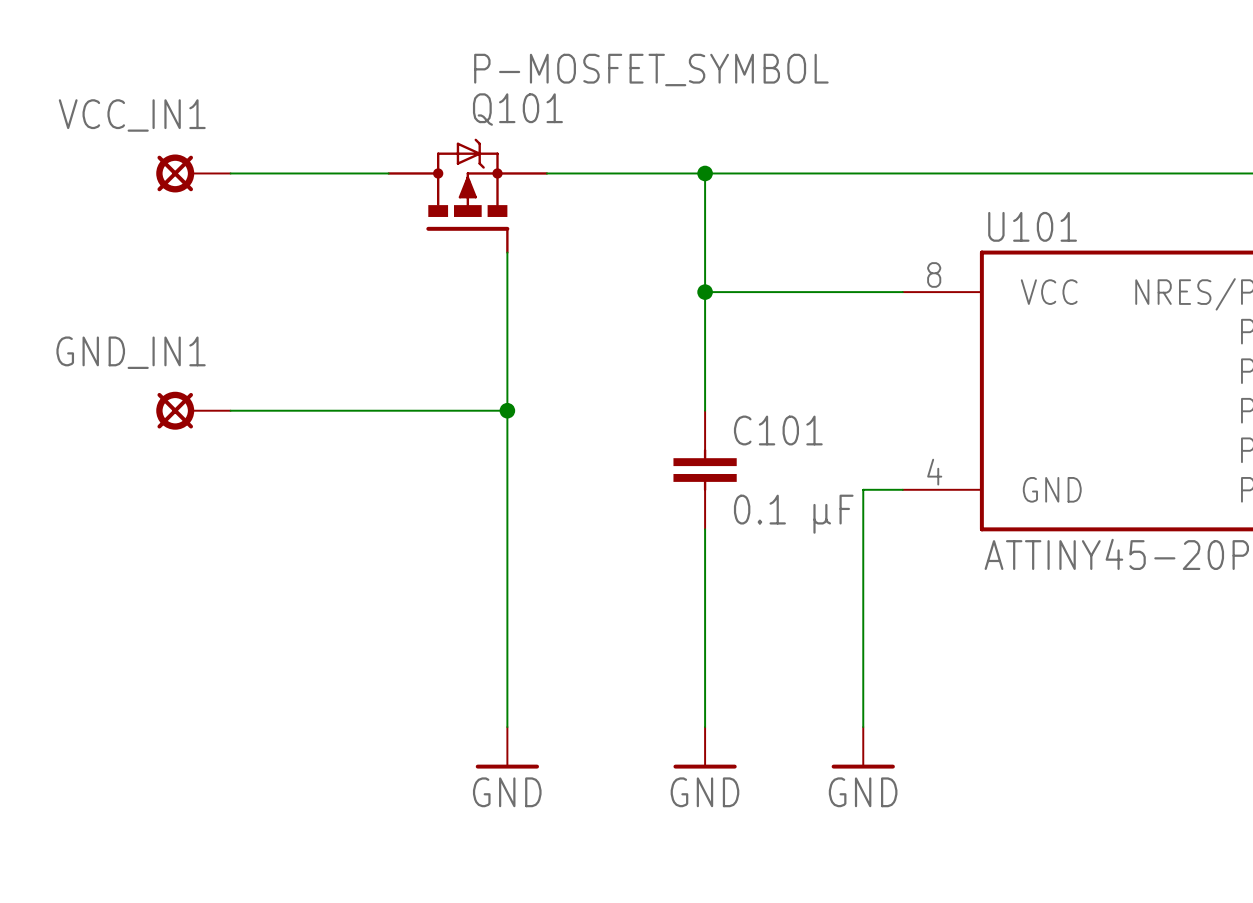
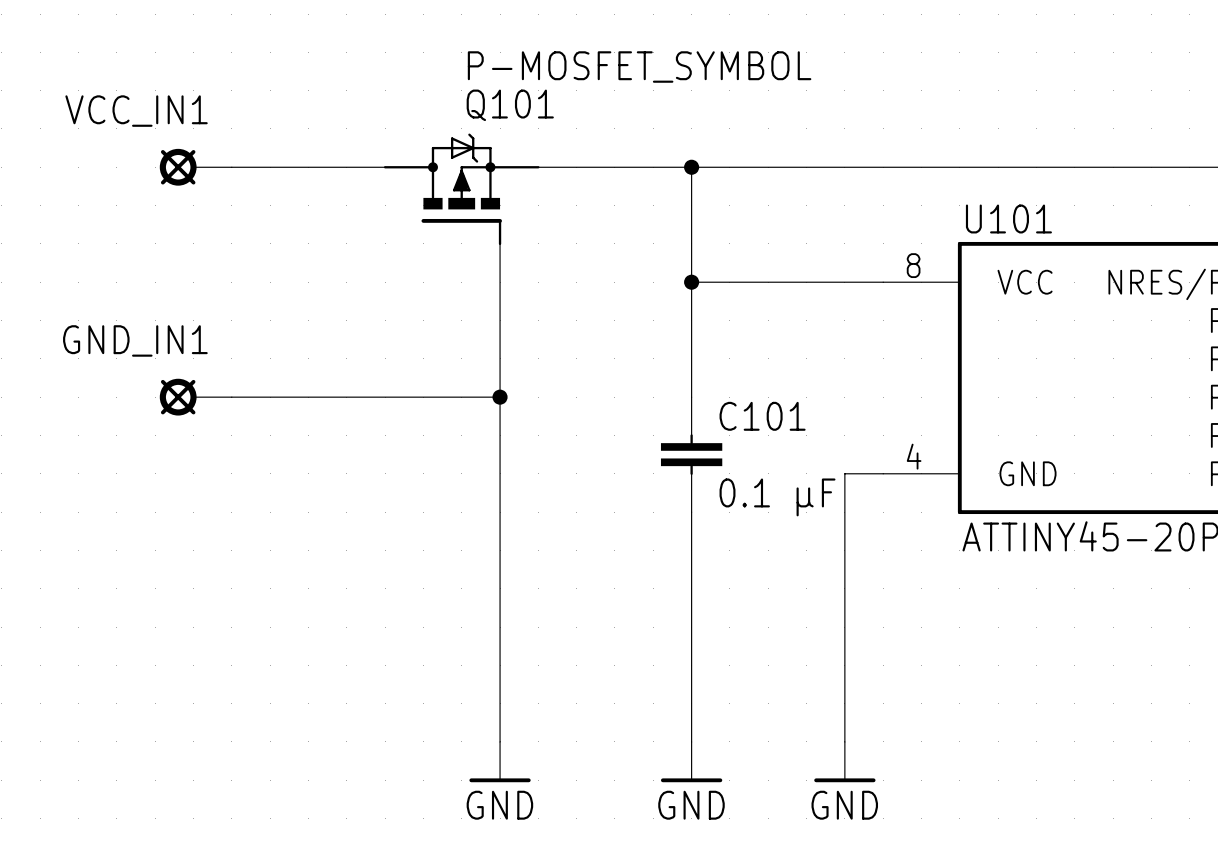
power symbol position: GND (507, 747) -> GND (500, 762)
power symbol position: GND (705, 747) -> GND (691, 762)
power symbol position: GND (863, 747) -> GND (844, 762)

